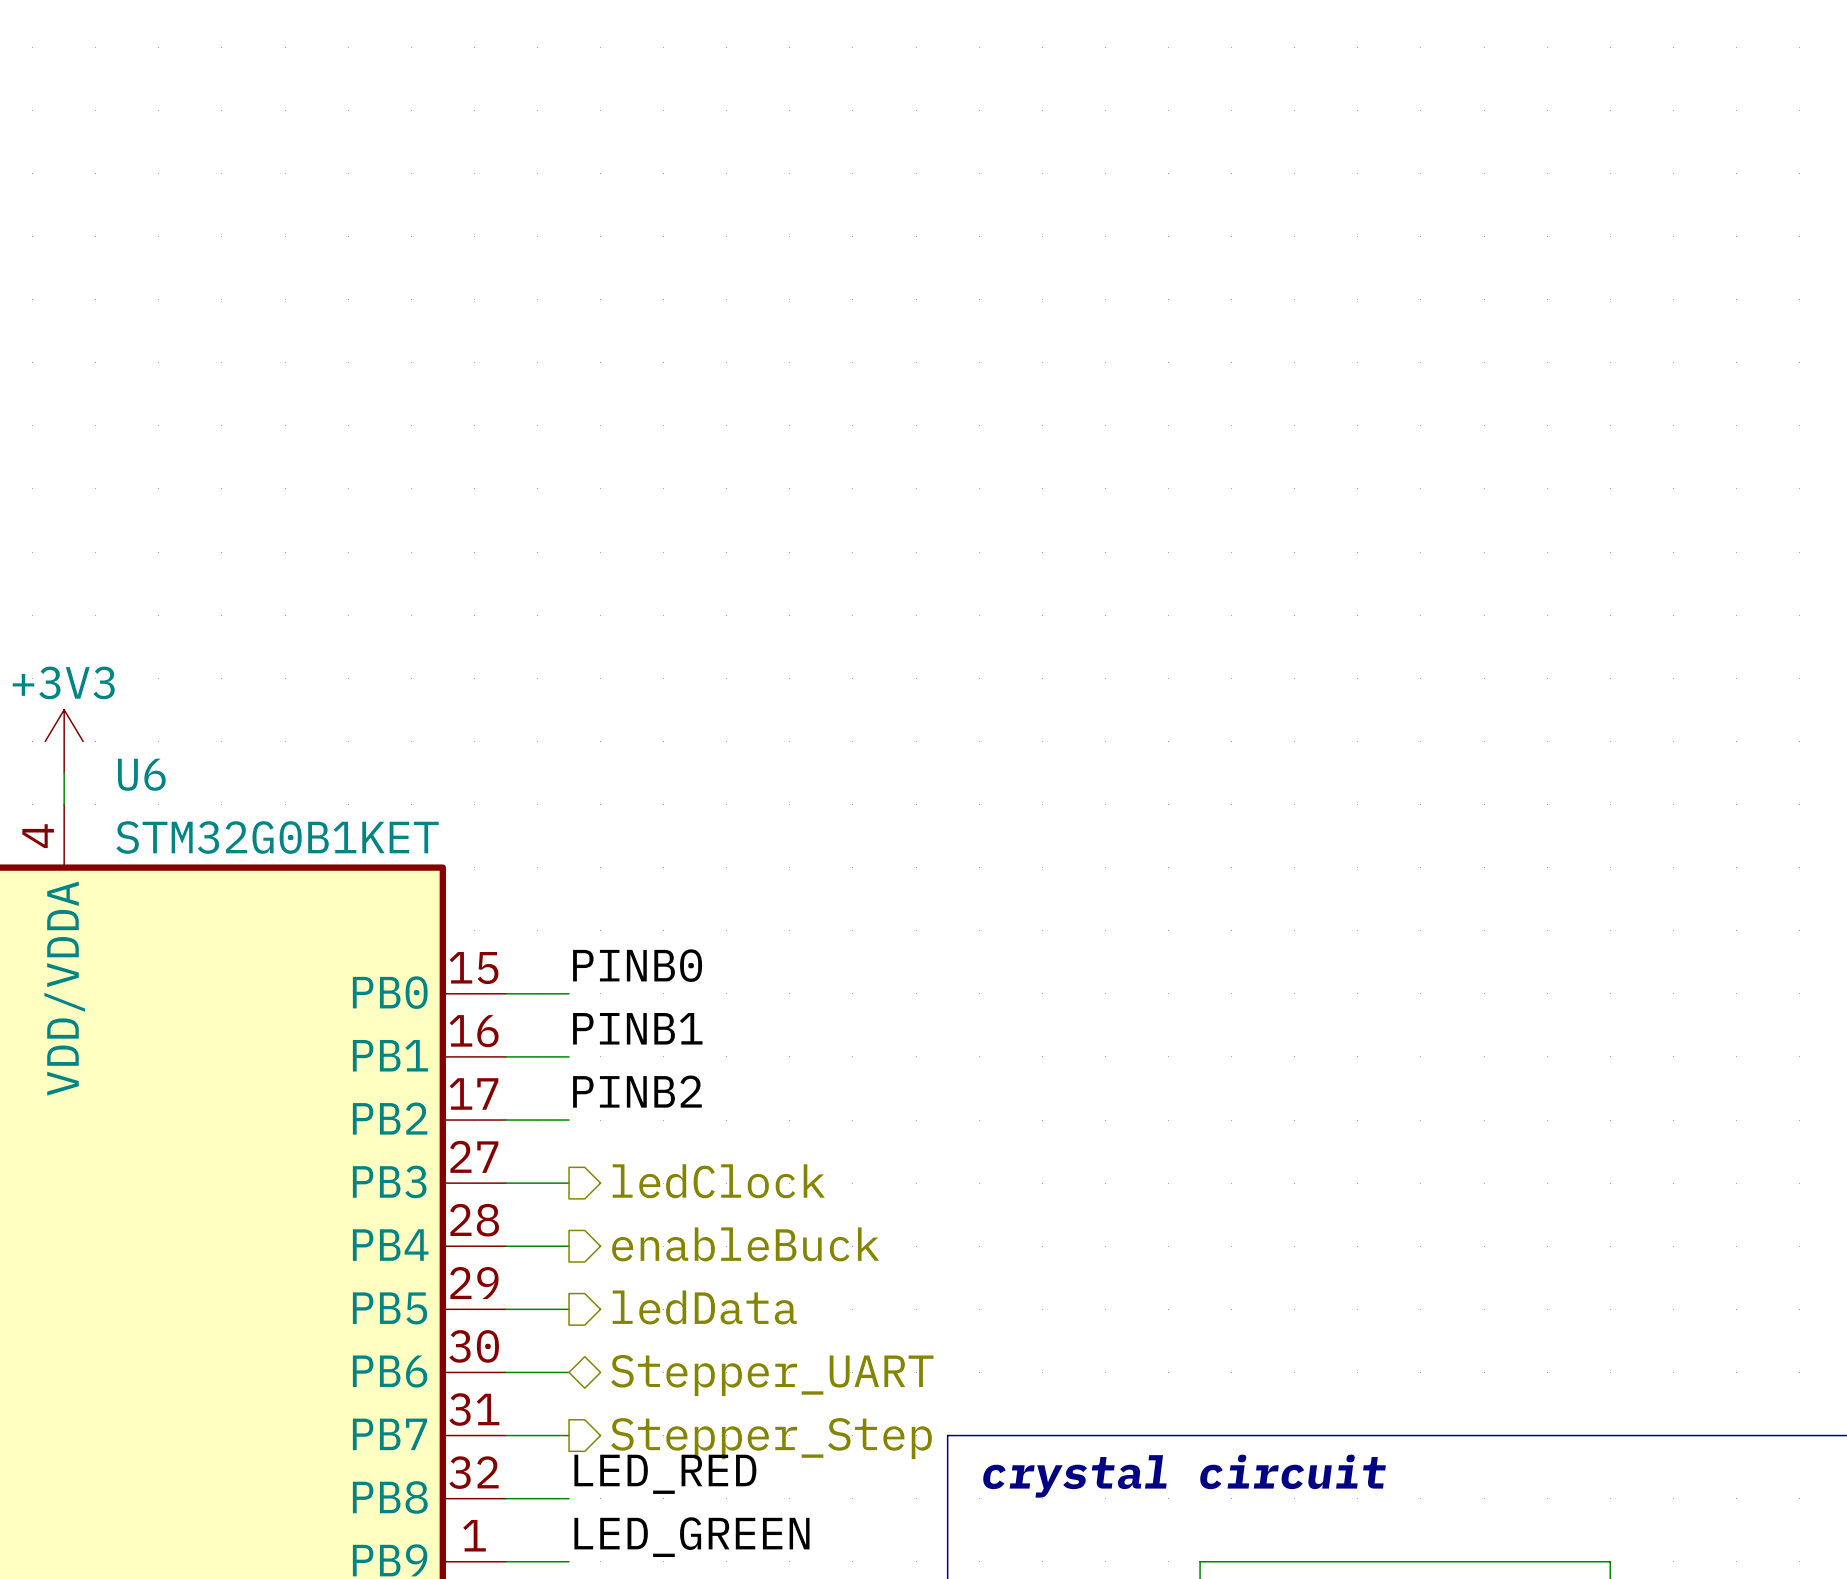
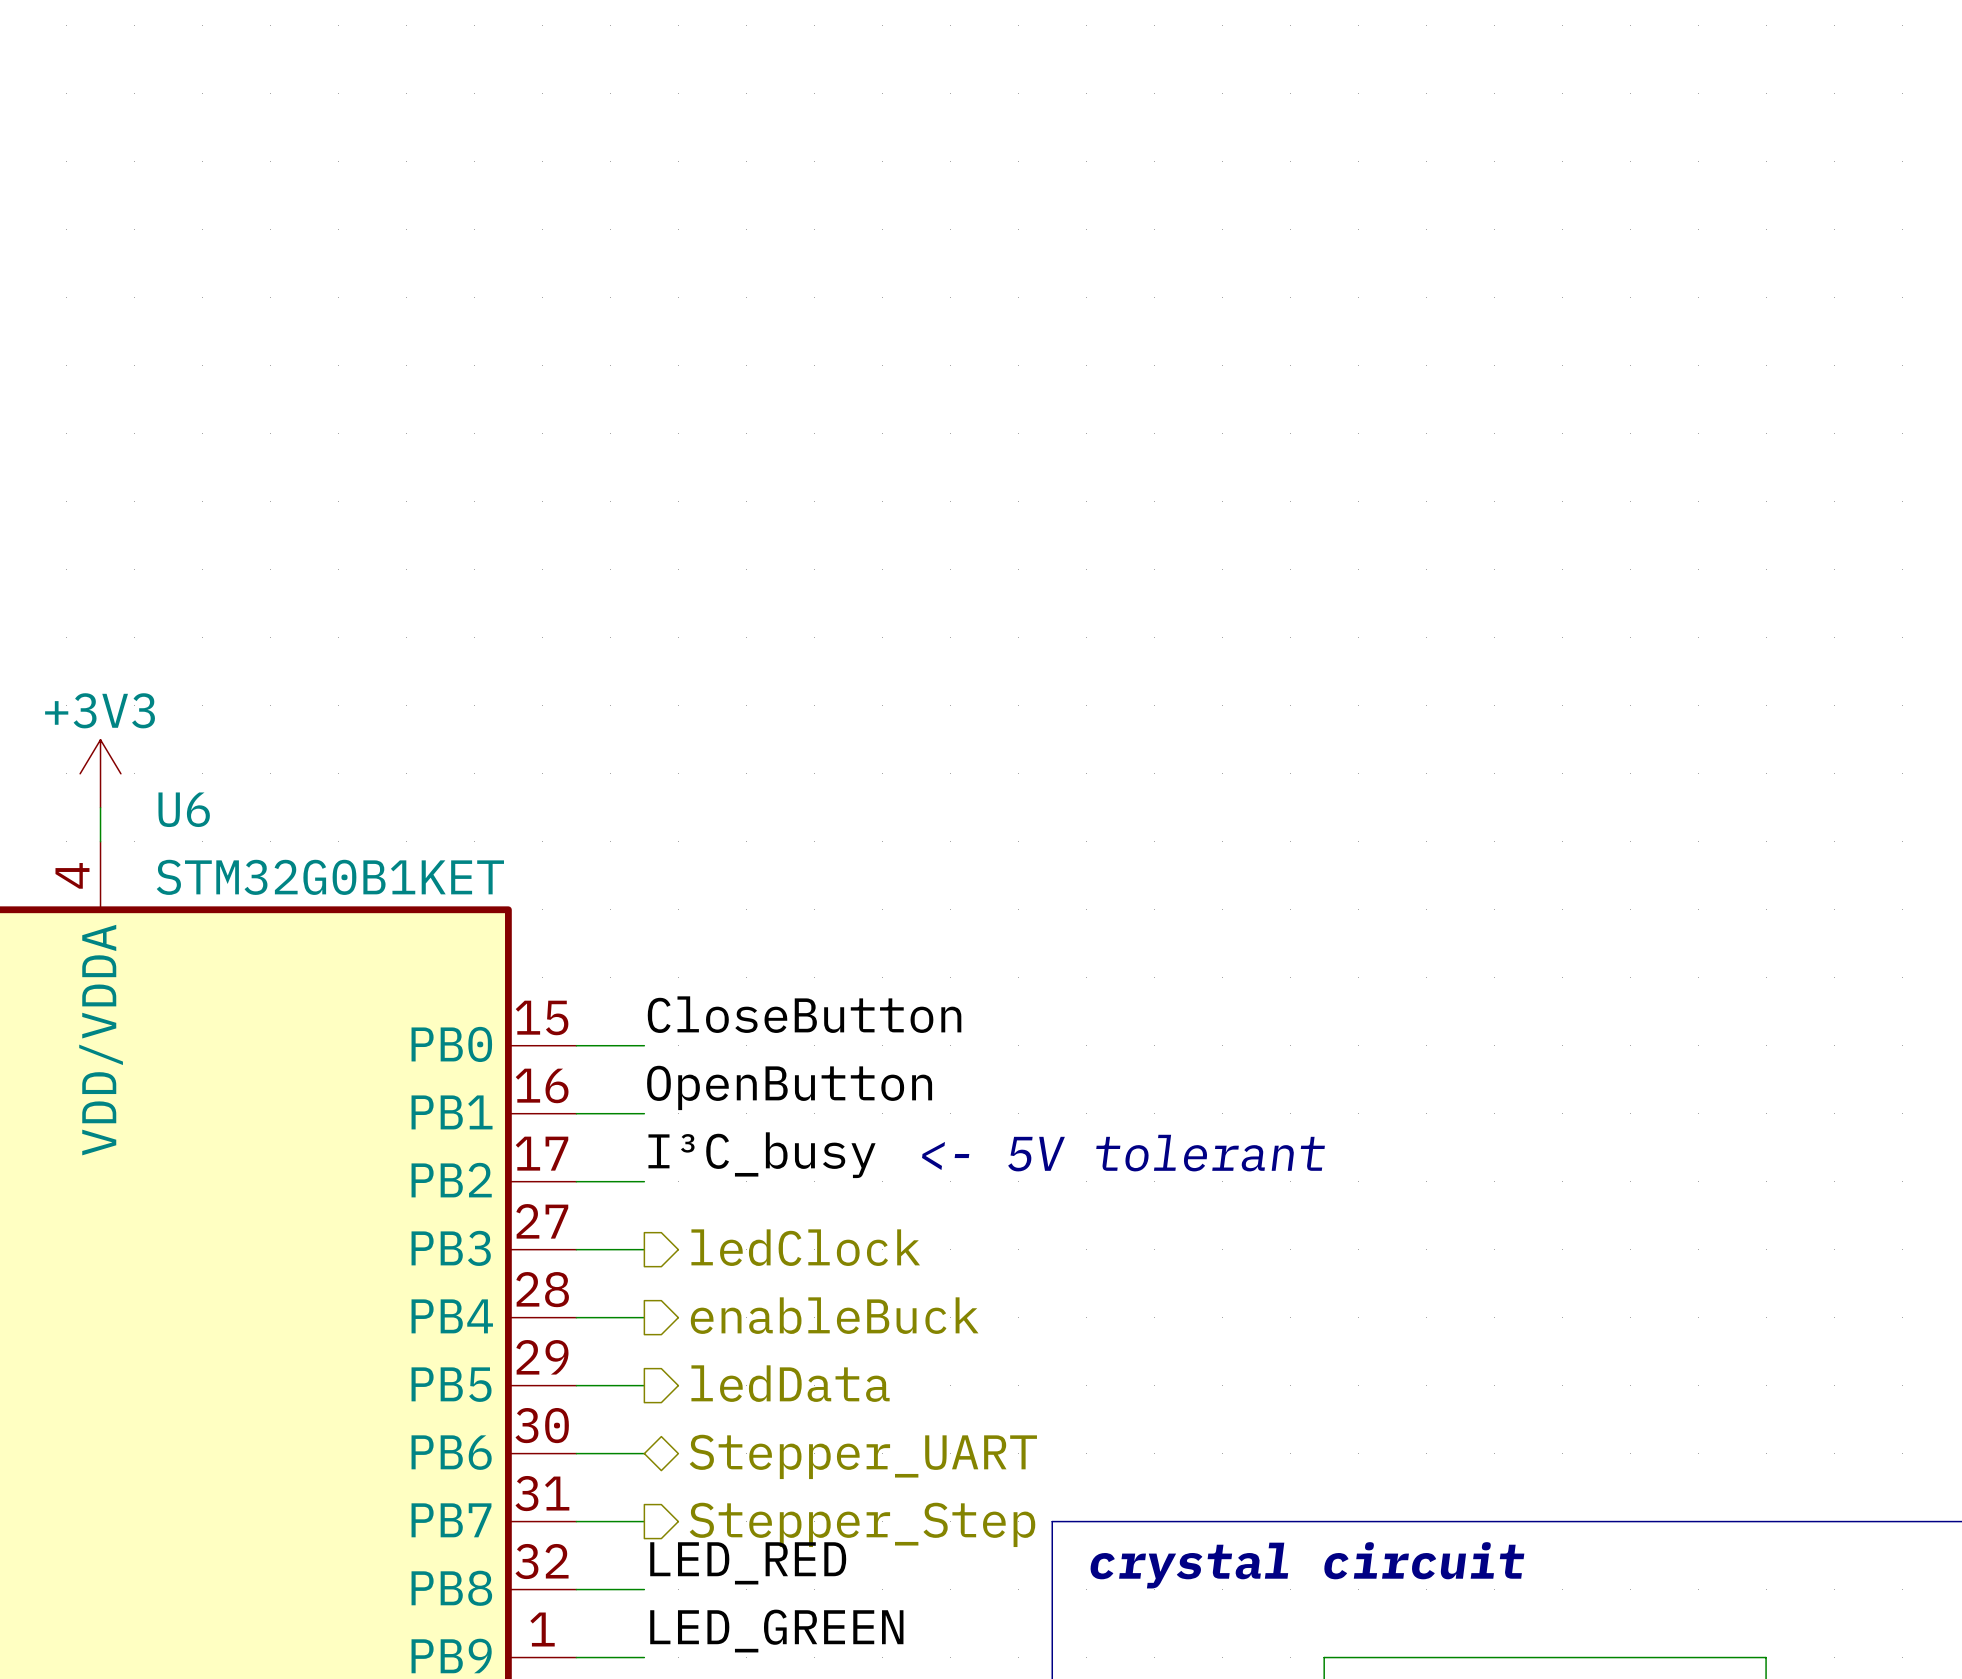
label: PINB0 (637, 965) -> CloseButton (804, 1014)
label: PINB1 (637, 1028) -> OpenButton (789, 1087)
label: PINB2 (637, 1091) -> I³C_busy (762, 1155)
text: none -> <- 5V tolerant (1123, 1153)

